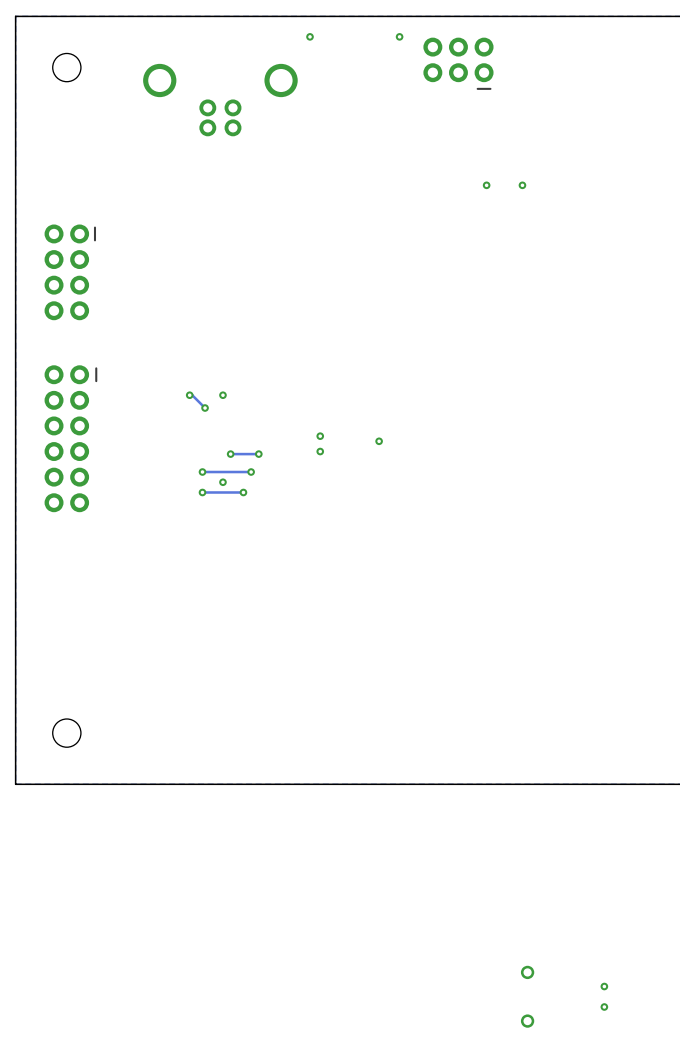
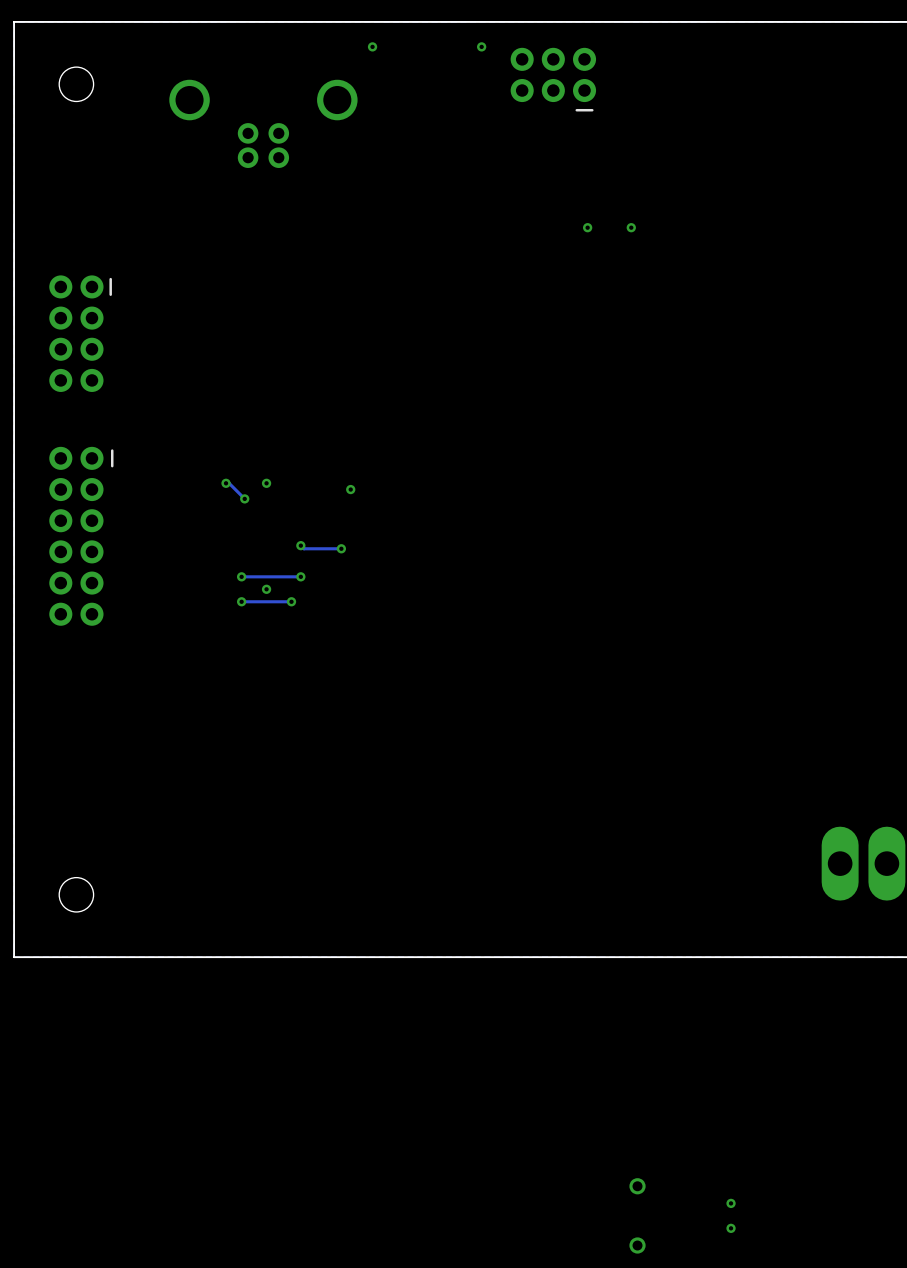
via: none -> (350, 489)
via: (320, 436) -> none
via: (379, 441) -> none
track: none -> (300, 545) (303, 548) (341, 548)
via: none -> (300, 545)
via: none -> (341, 548)
via: (320, 451) -> none
via: (230, 454) -> none
track: (258, 454) (230, 454) -> none
via: (258, 454) -> none

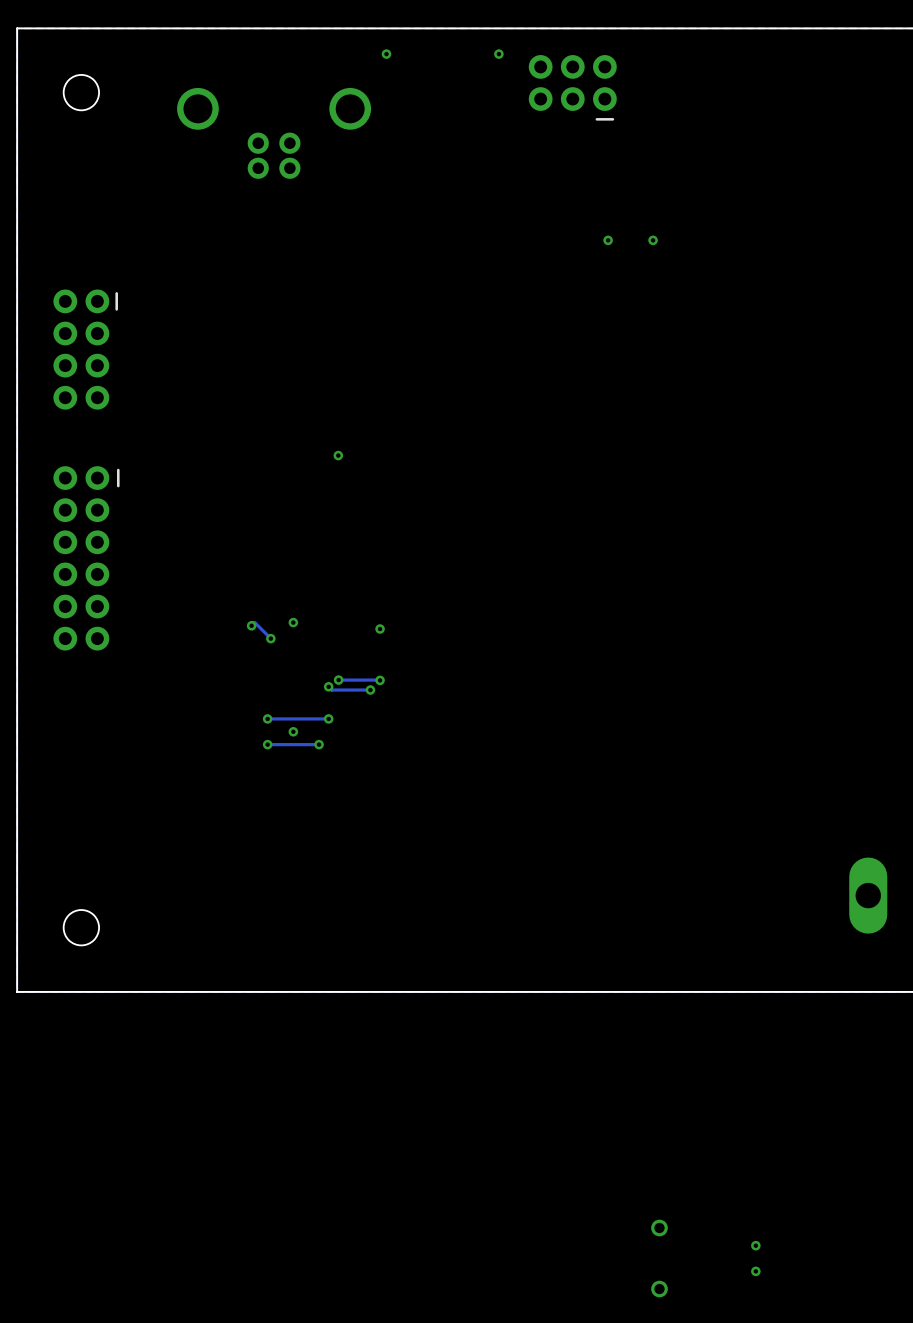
via: none -> (338, 455)
track: (226, 483) (229, 483) (244, 498) -> (251, 622) (254, 622) (270, 638)
via: (226, 483) -> none
via: (266, 483) -> none
via: (350, 489) -> none
via: (244, 498) -> none
track: (300, 545) (303, 548) (341, 548) -> (328, 686) (331, 690) (370, 690)
via: (300, 545) -> none
via: (341, 548) -> none
via: (241, 576) -> none
track: (300, 576) (241, 576) -> (328, 718) (267, 718)
via: (300, 576) -> none
via: (266, 589) -> none
via: none -> (293, 622)
track: (291, 601) (241, 601) -> (319, 744) (267, 744)
via: (291, 601) -> none
via: none -> (380, 629)
via: none -> (270, 638)
track: none -> (338, 680) (380, 680)
via: none -> (338, 680)
via: none -> (380, 680)
via: none -> (328, 686)
via: none -> (370, 690)
via: none -> (267, 718)
via: none -> (328, 718)
via: none -> (293, 731)
via: none -> (267, 744)
via: none -> (319, 744)

